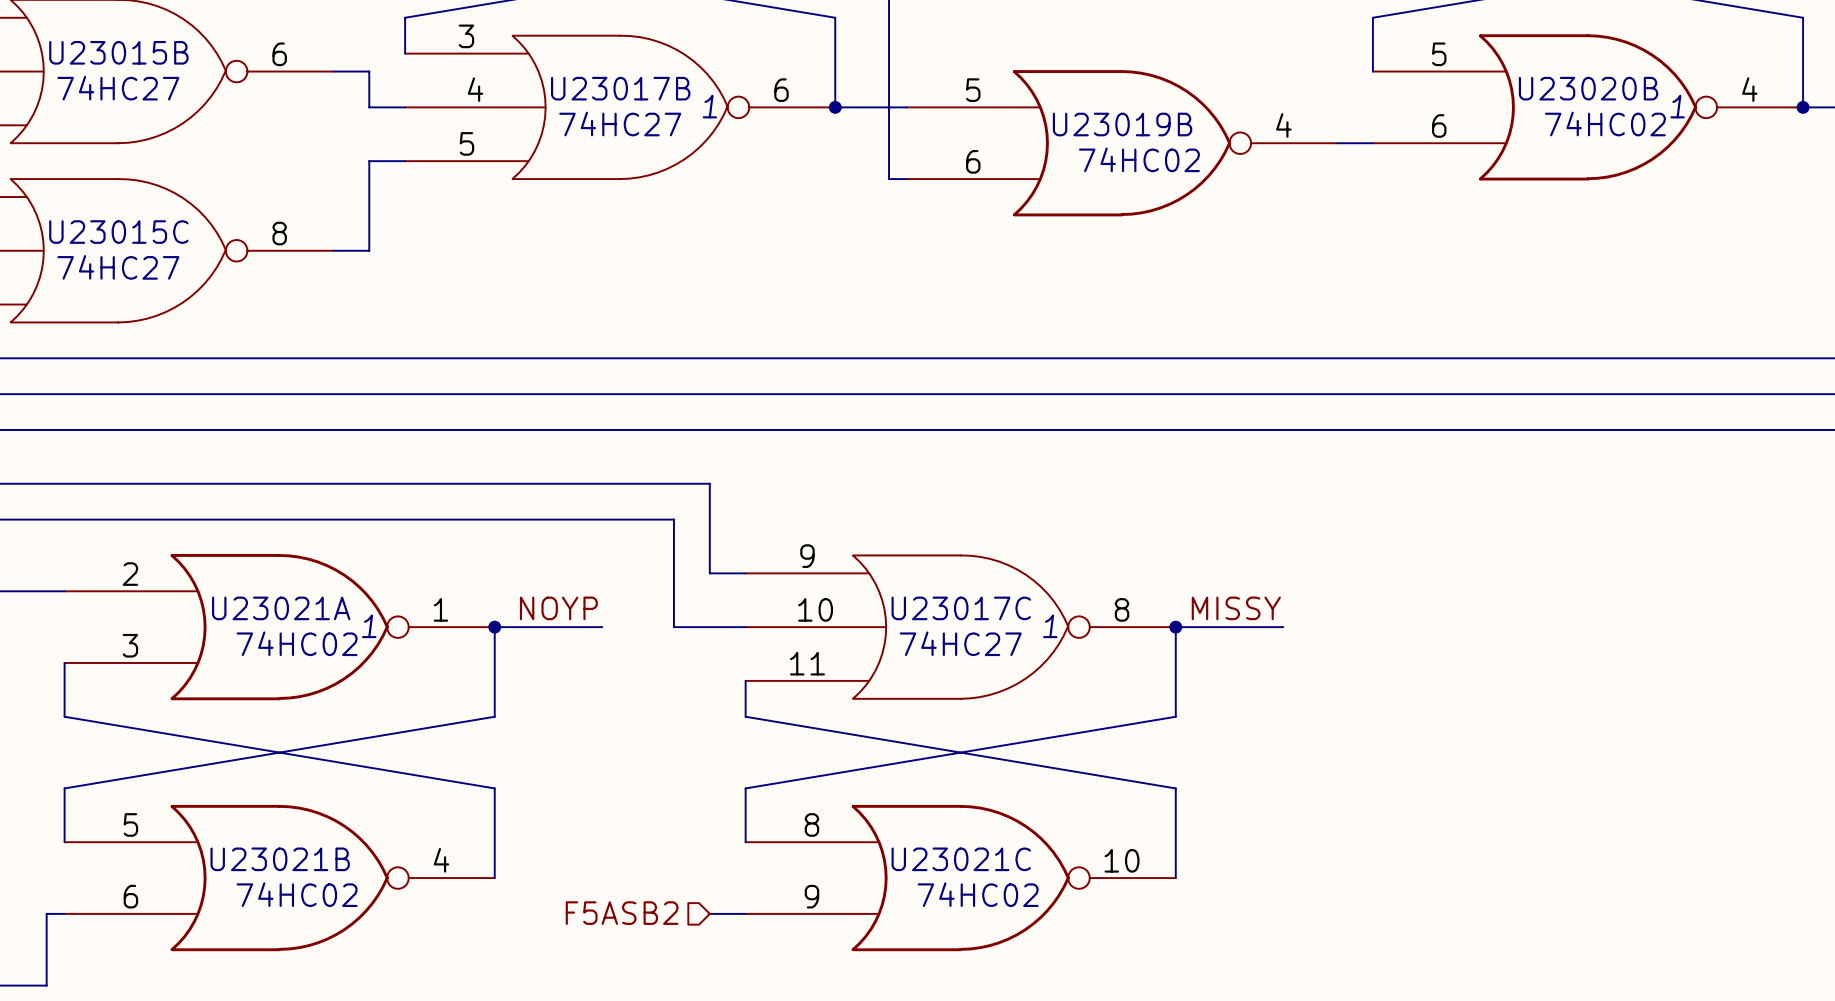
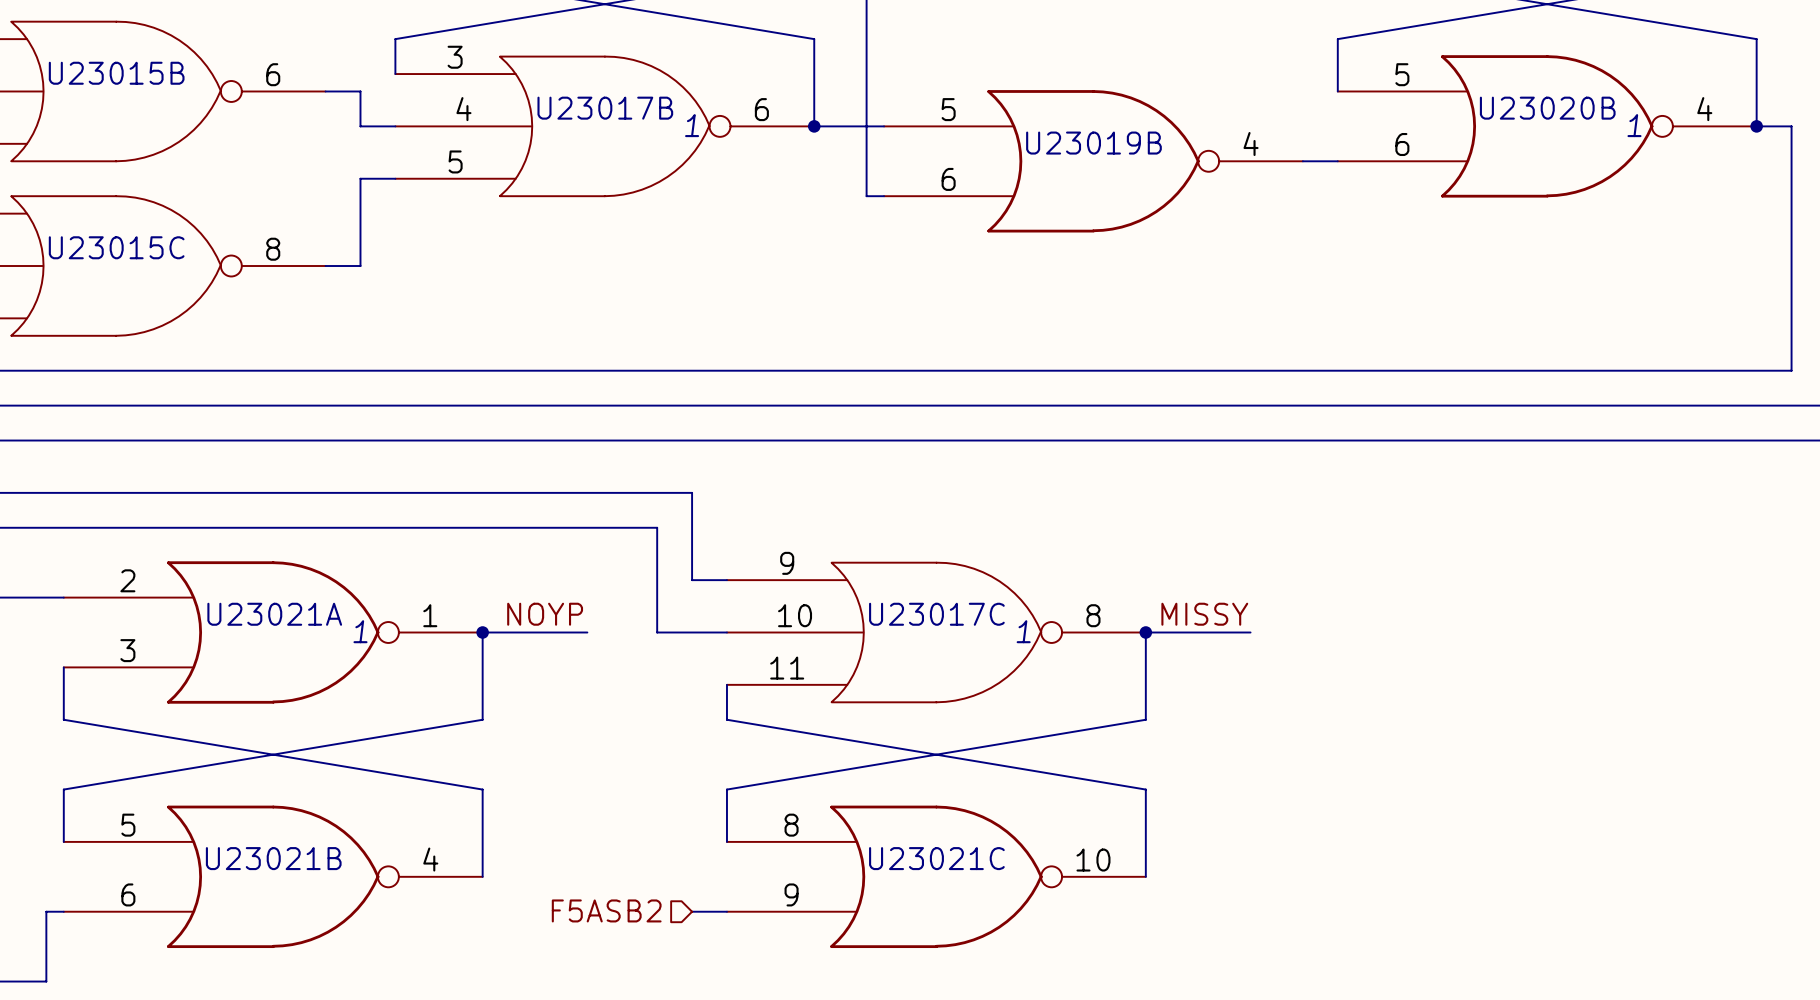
U23015B value: 74HC27 (118, 88) -> none
U23017B value: 74HC27 (620, 123) -> none
U23020B value: 74HC02 (1605, 123) -> none
U23019B value: 74HC02 (1139, 159) -> none
U23015C value: 74HC27 (118, 267) -> none
U23021A value: 74HC02 (297, 643) -> none
U23017C value: 74HC27 (960, 643) -> none
U23021B value: 74HC02 (297, 894) -> none
U23021C value: 74HC02 (978, 894) -> none

